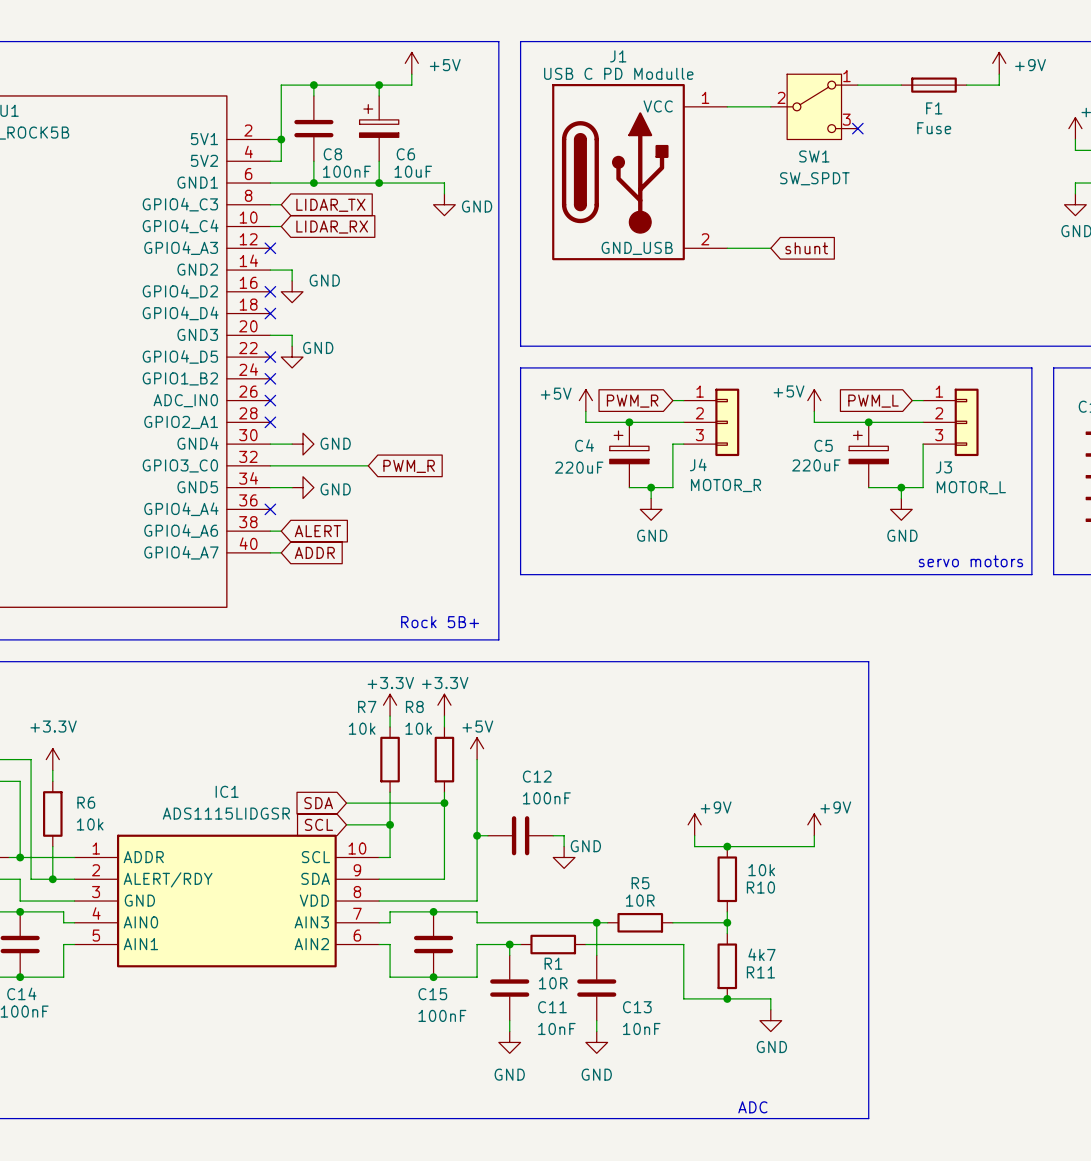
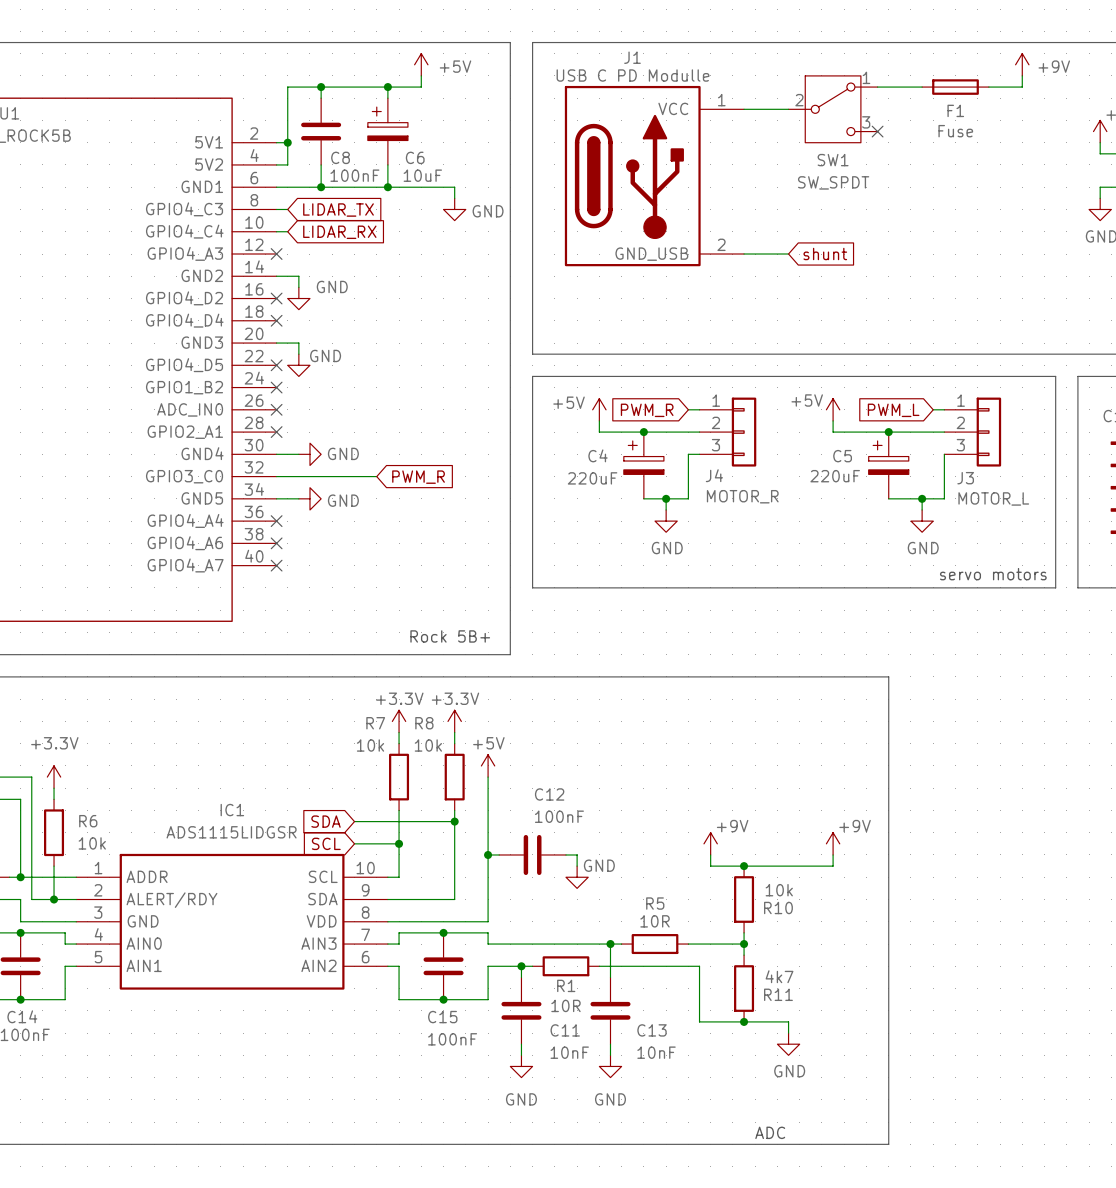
wire: (270, 531) (281, 531) -> none
no-connect mark: none -> (276, 543)
global label: ALERT (317, 531) -> none
wire: (270, 552) (281, 552) -> none
no-connect mark: none -> (276, 565)
global label: ADDR (314, 552) -> none

